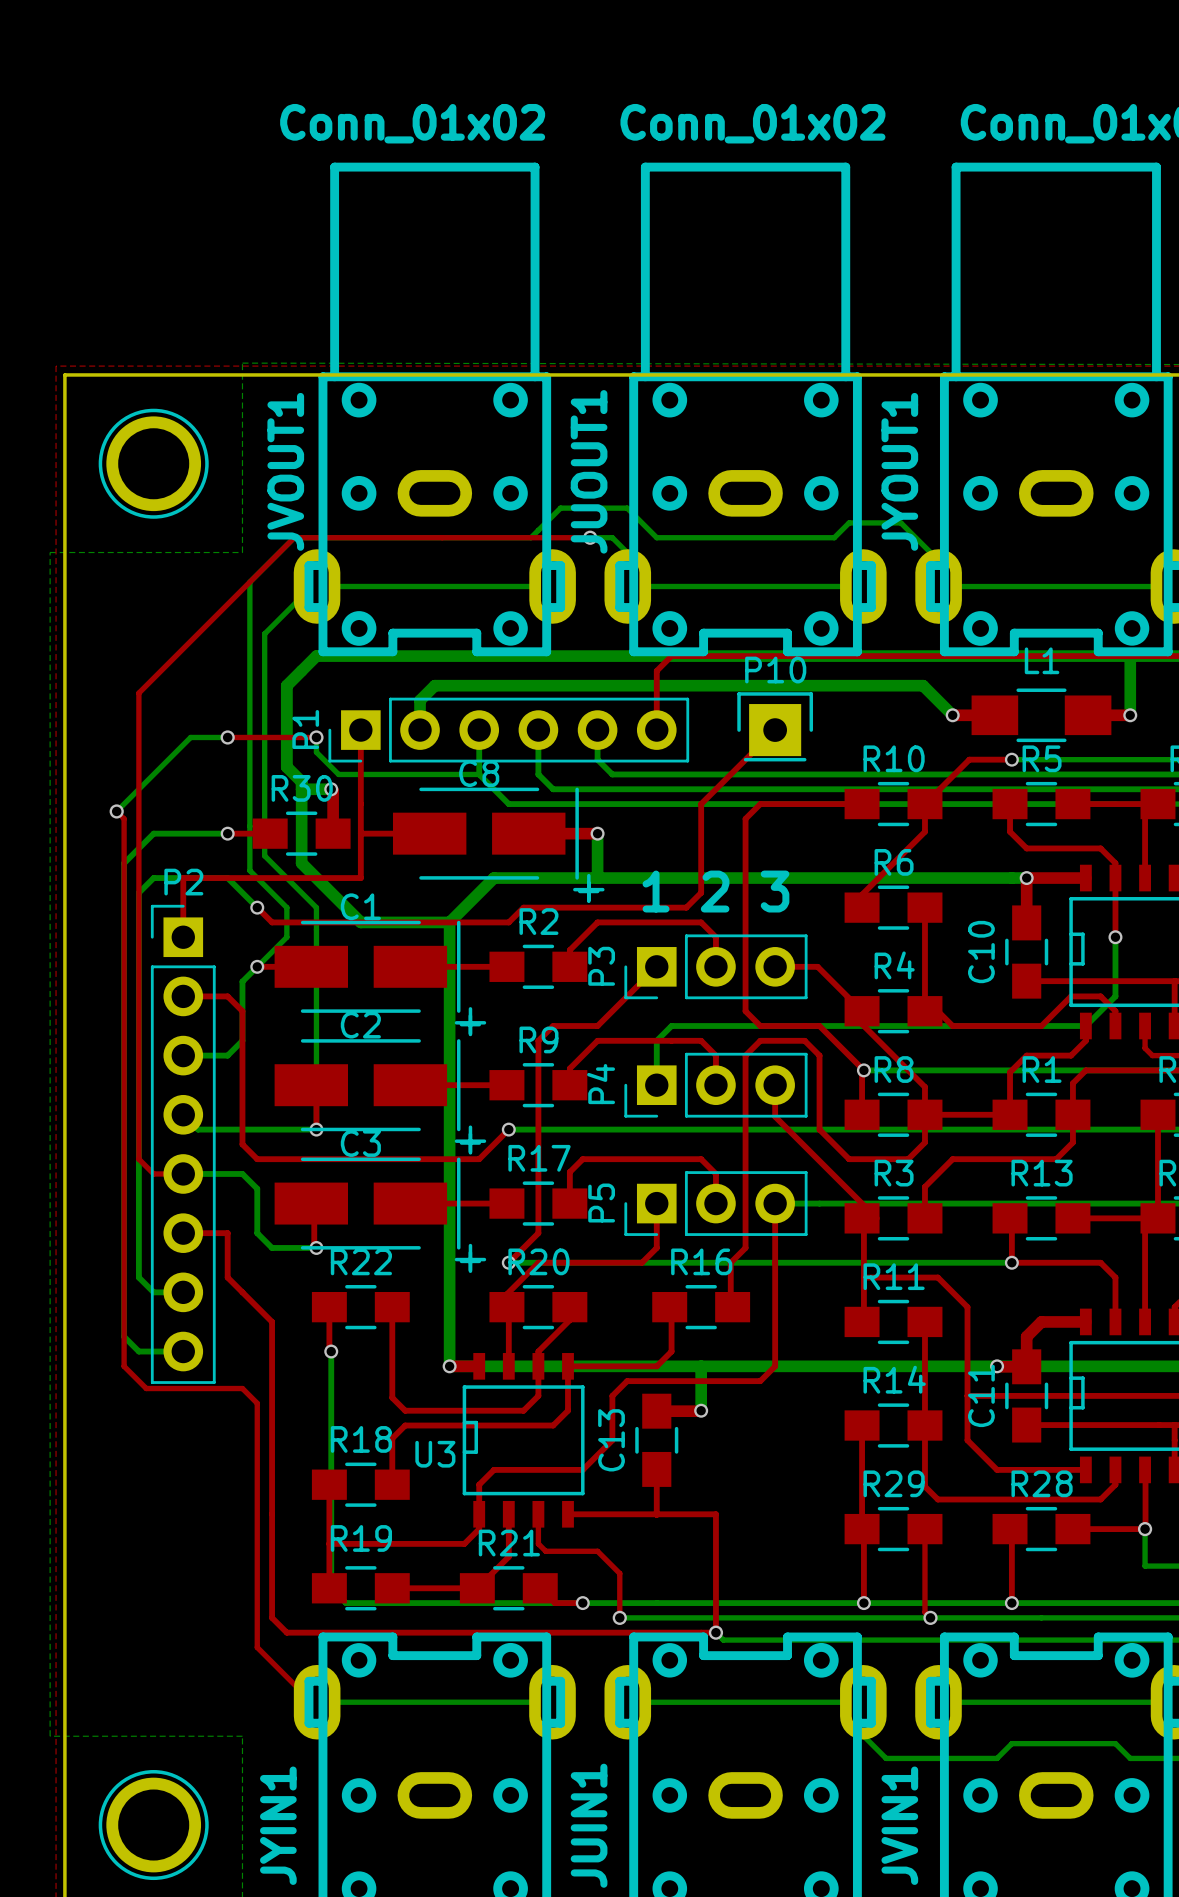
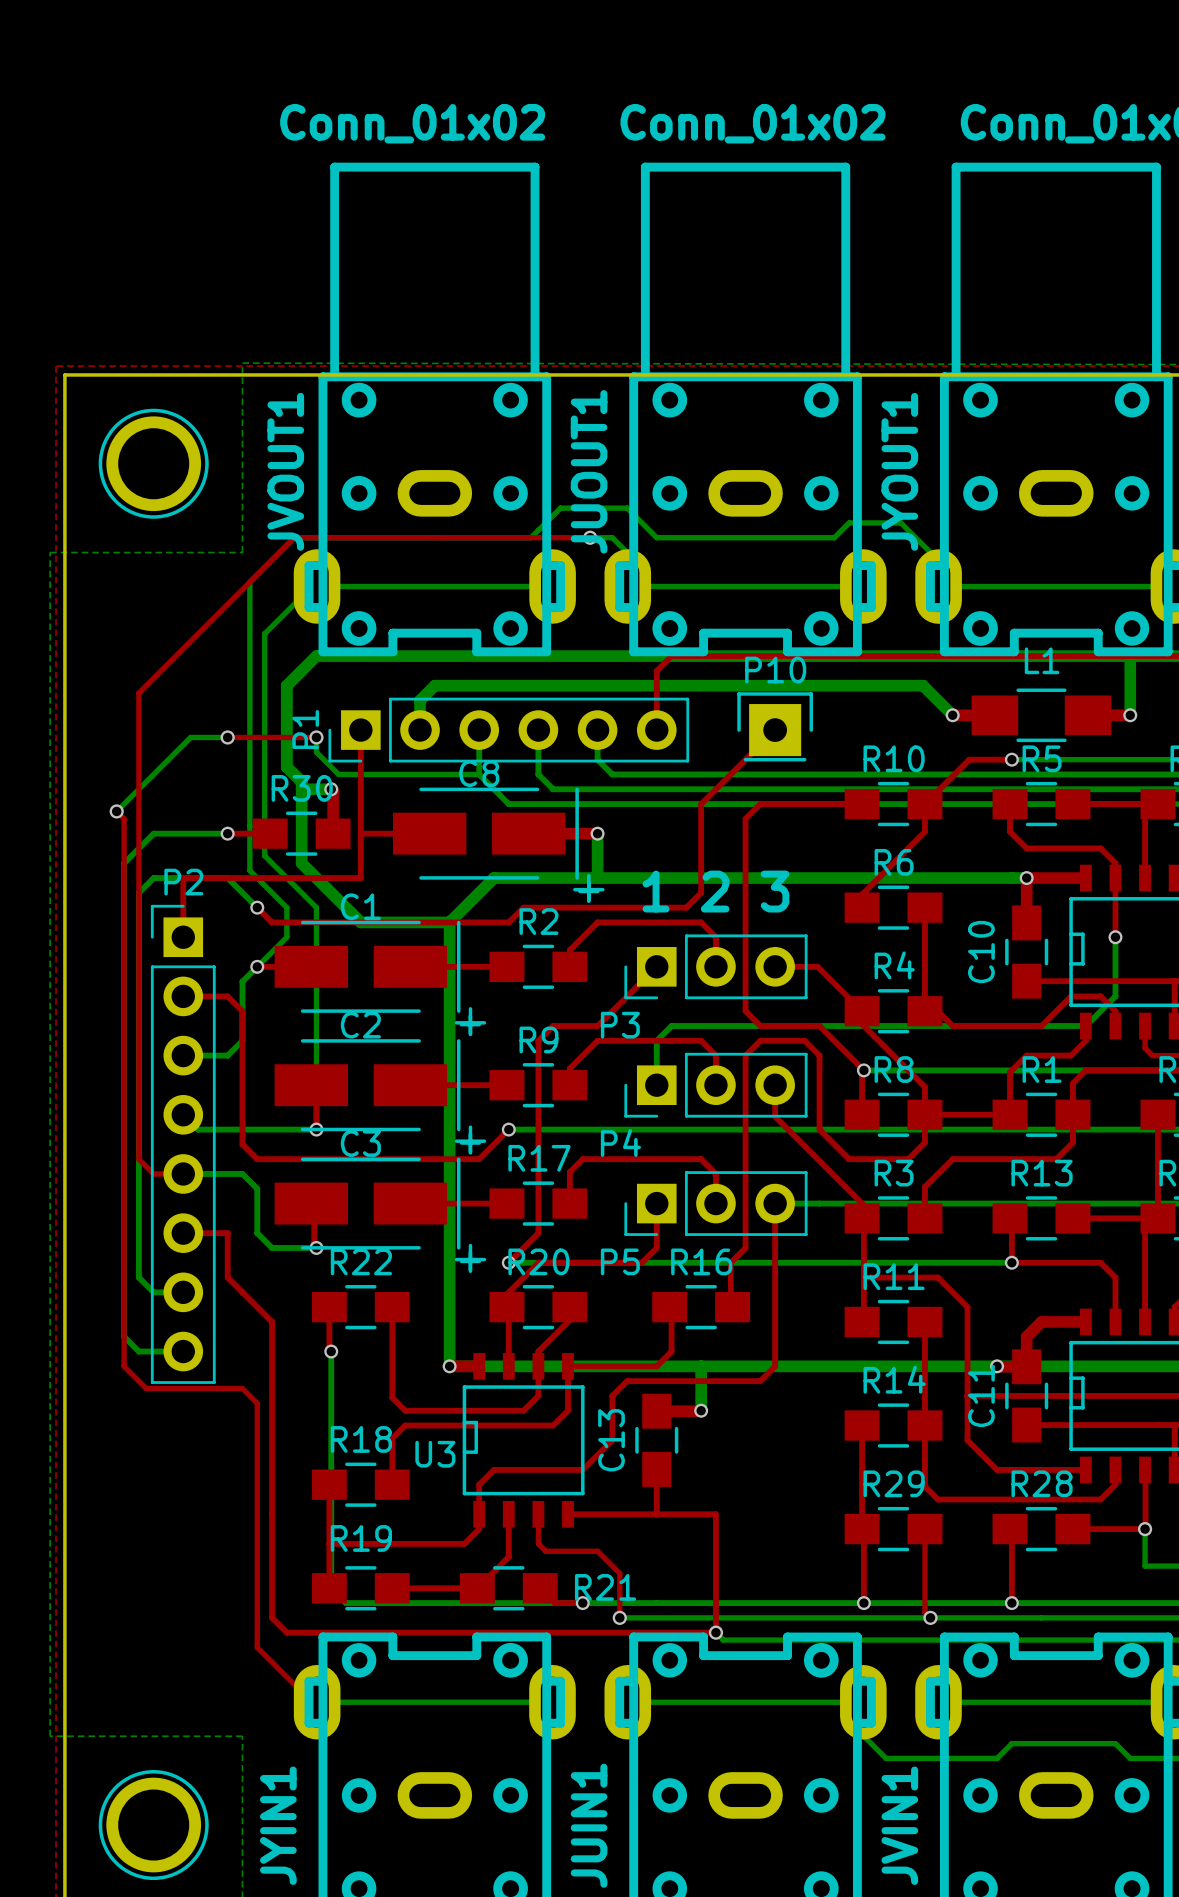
P3 name rotation: 0° (601, 966) -> 90° clockwise (620, 1025)
P3 name position: P3 (601, 966) -> P3 (620, 1025)
P4 name rotation: 0° (601, 1084) -> 90° clockwise (620, 1142)
P4 name position: P4 (601, 1084) -> P4 (620, 1142)
P5 name rotation: 0° (601, 1203) -> 90° clockwise (620, 1261)
P5 name position: P5 (601, 1203) -> P5 (620, 1261)
R21 name position: R21 (509, 1543) -> R21 (605, 1587)

